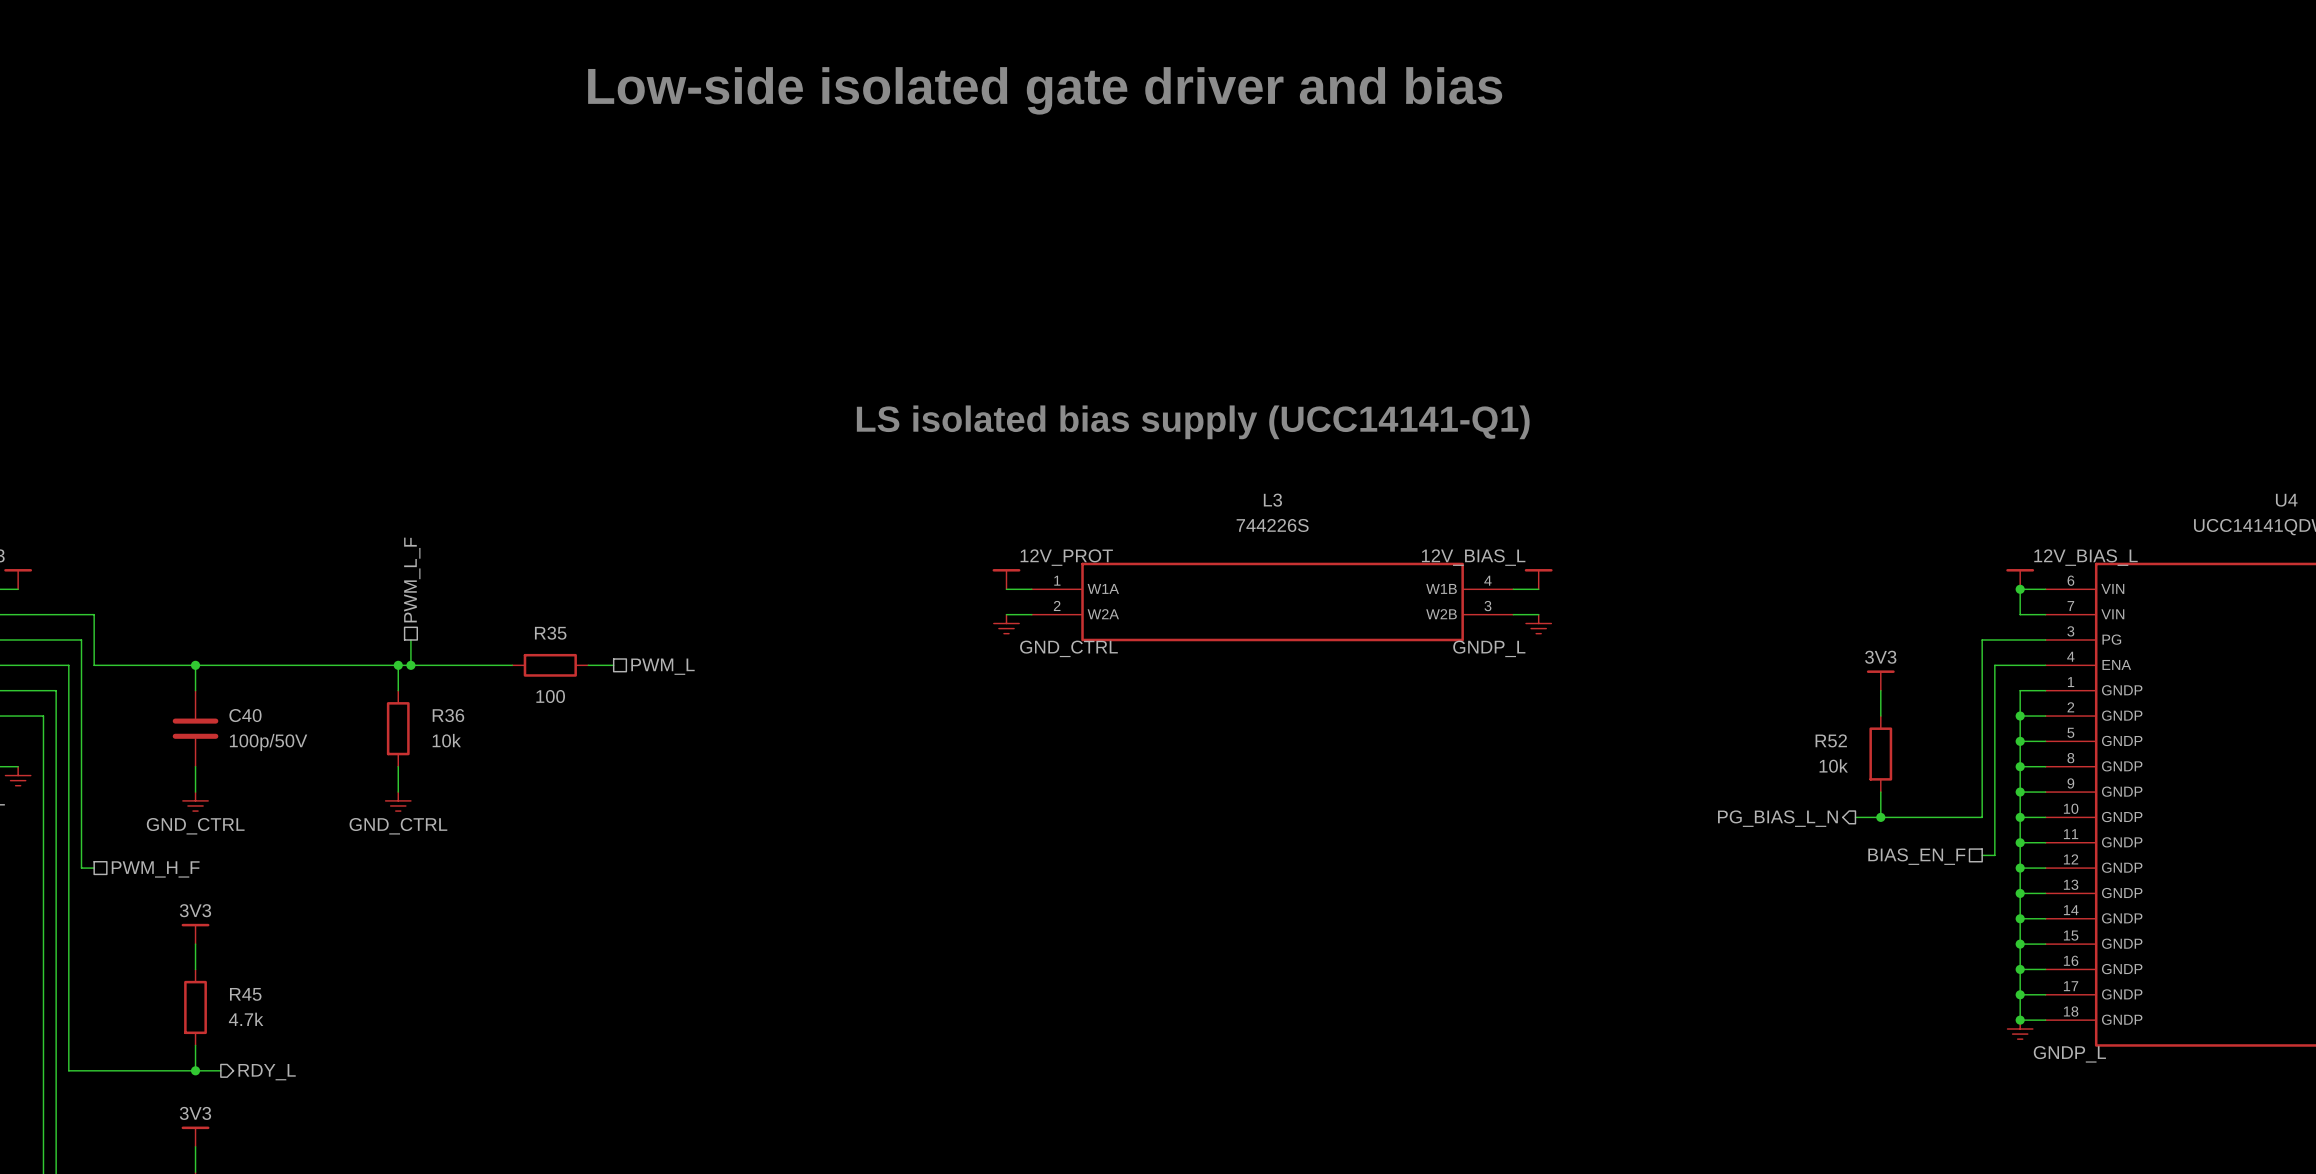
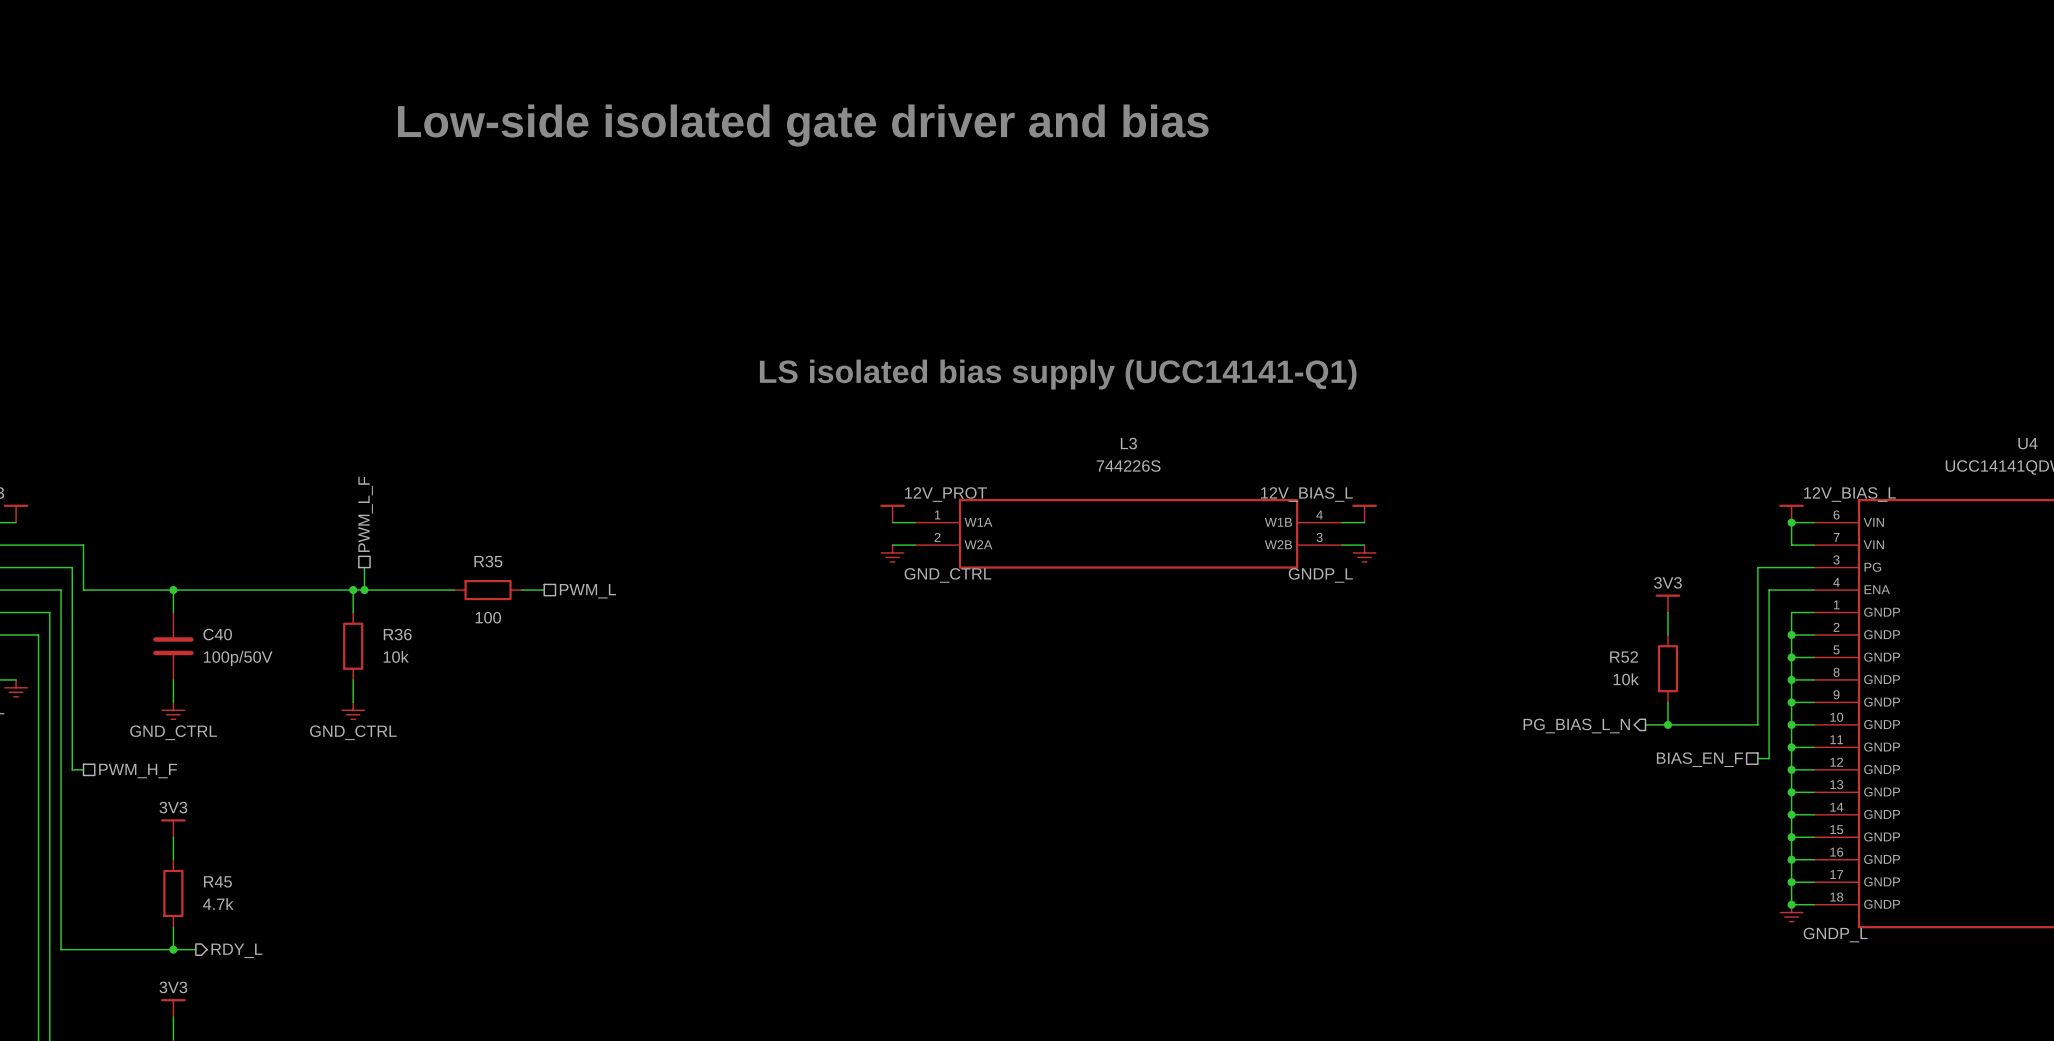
text position: Low-side isolated gate driver and bias (1045, 90) -> Low-side isolated gate driver and bias (803, 125)

